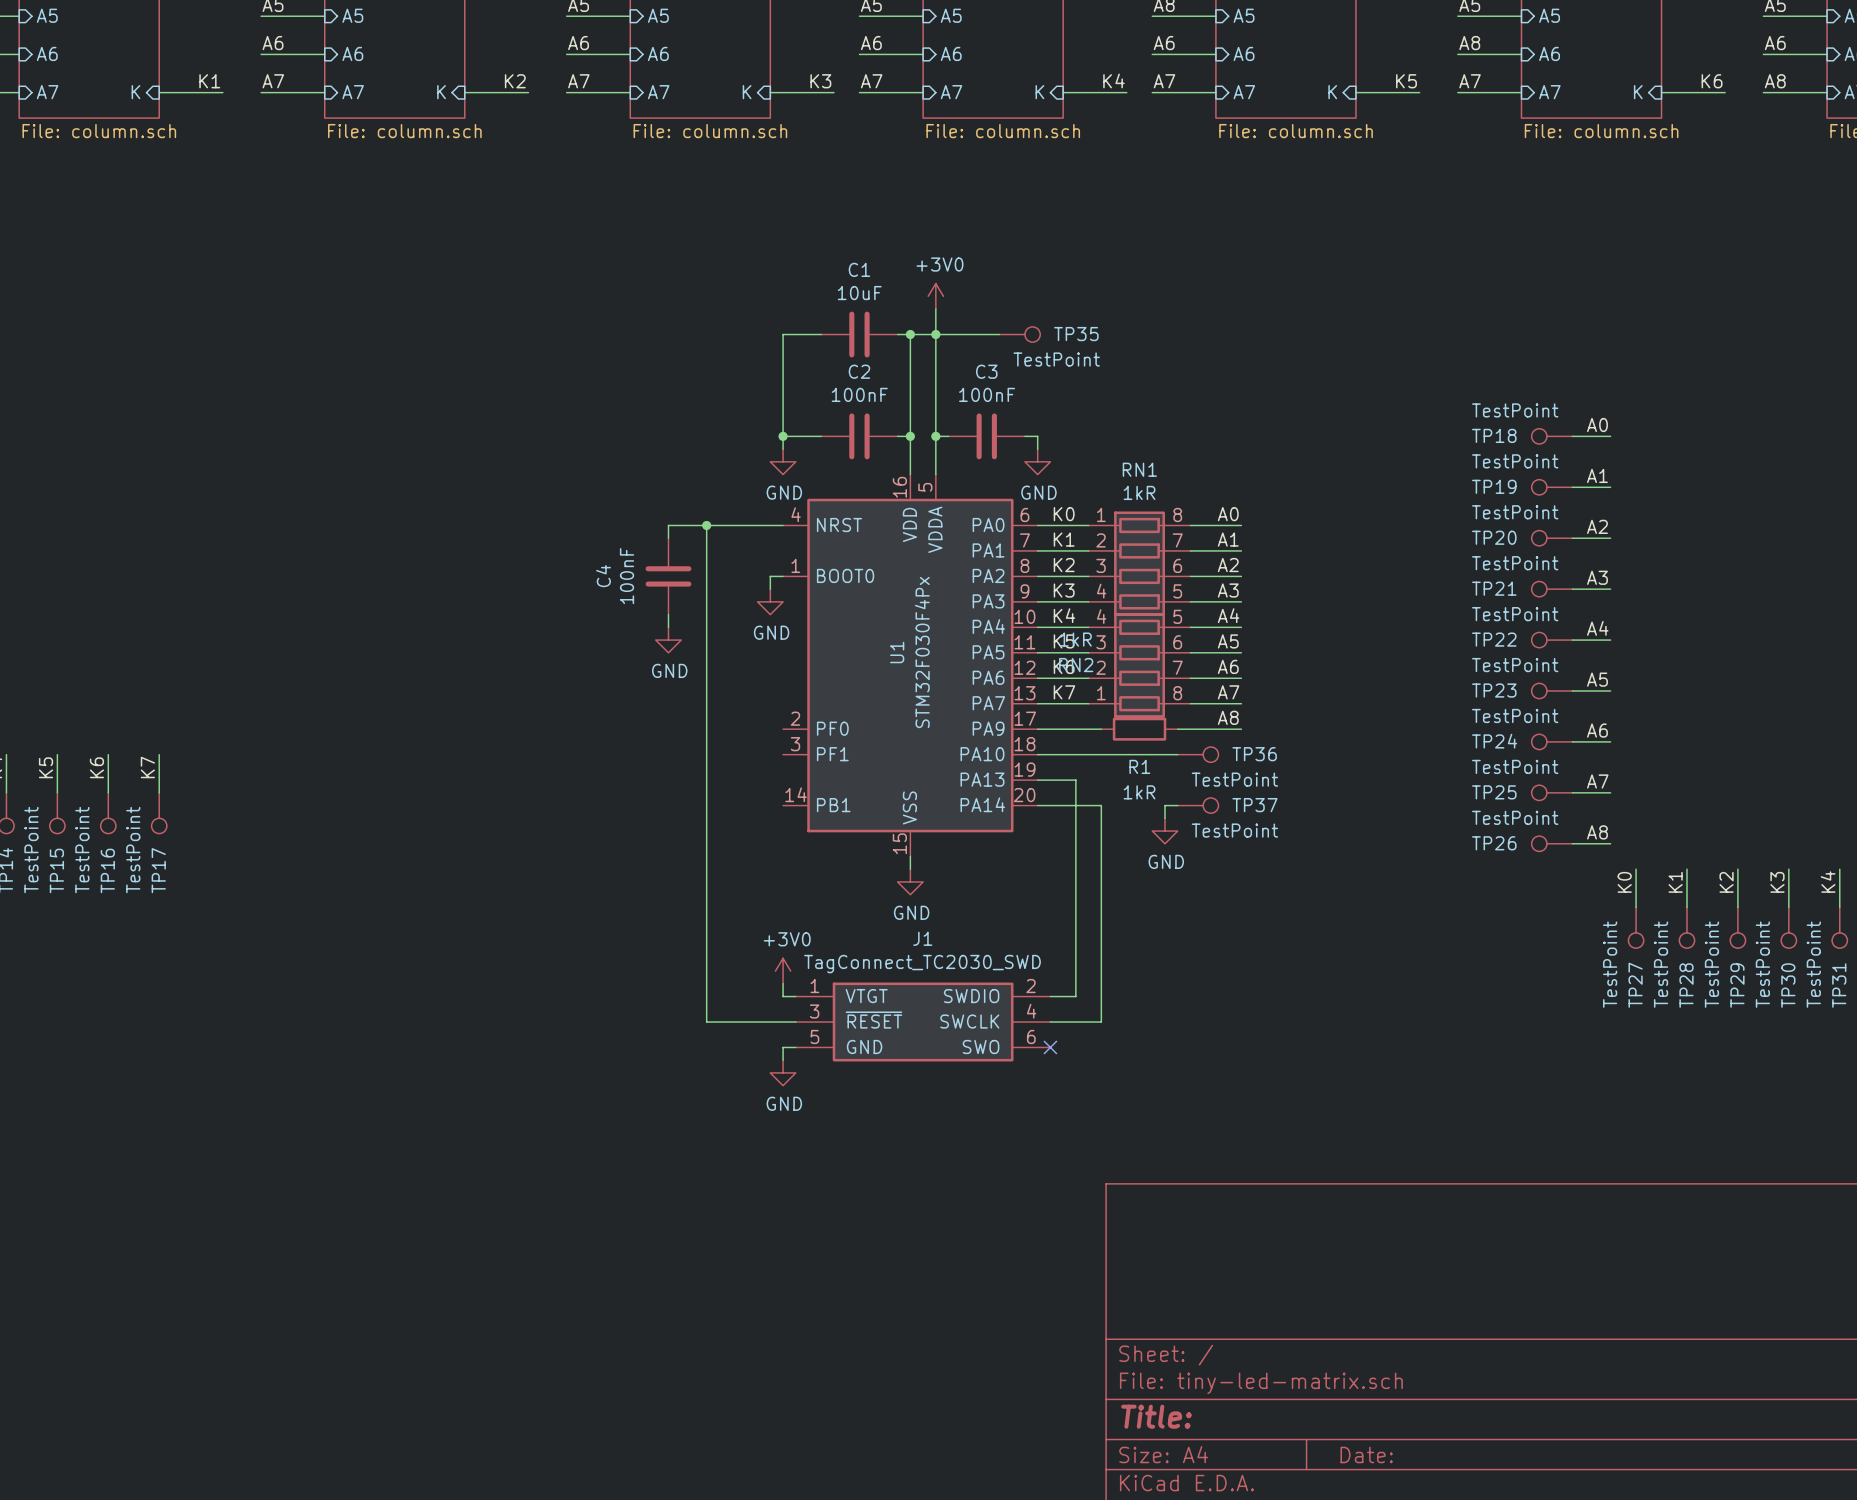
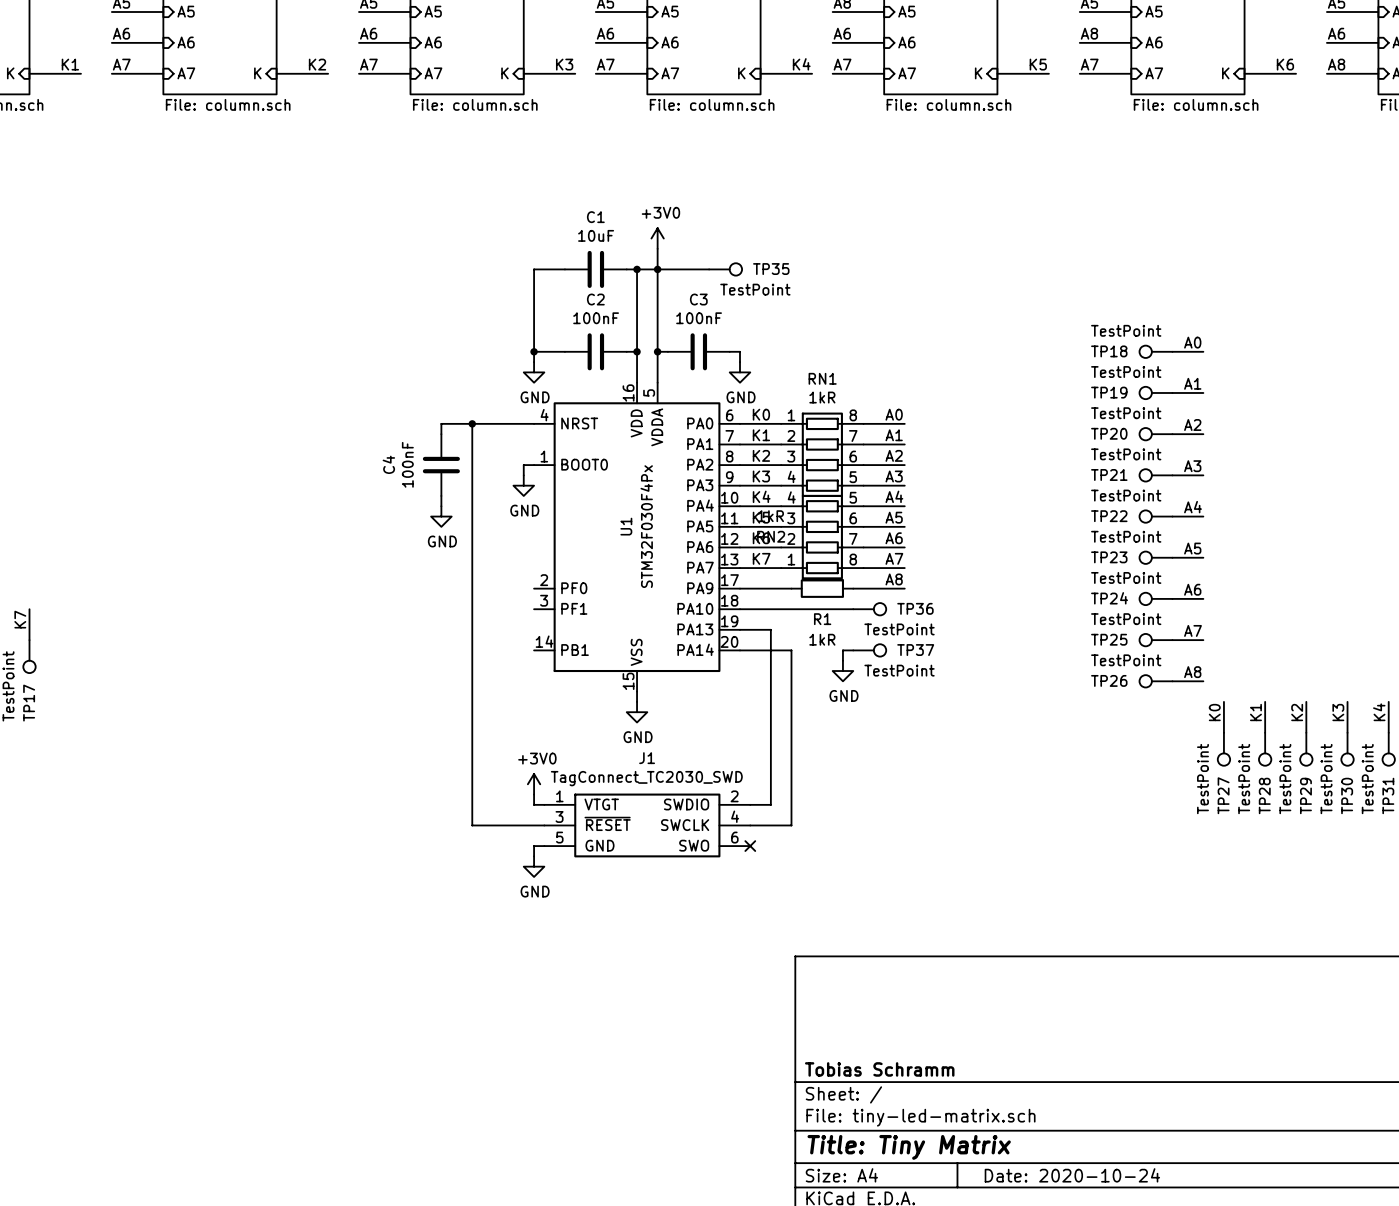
title block: none -> Tobias Schramm (879, 1069)
title block: Title: (1156, 1416) -> Title: Tiny Matrix (909, 1147)
title block: Date: (1366, 1454) -> Date: 2020-10-24 (1072, 1175)

